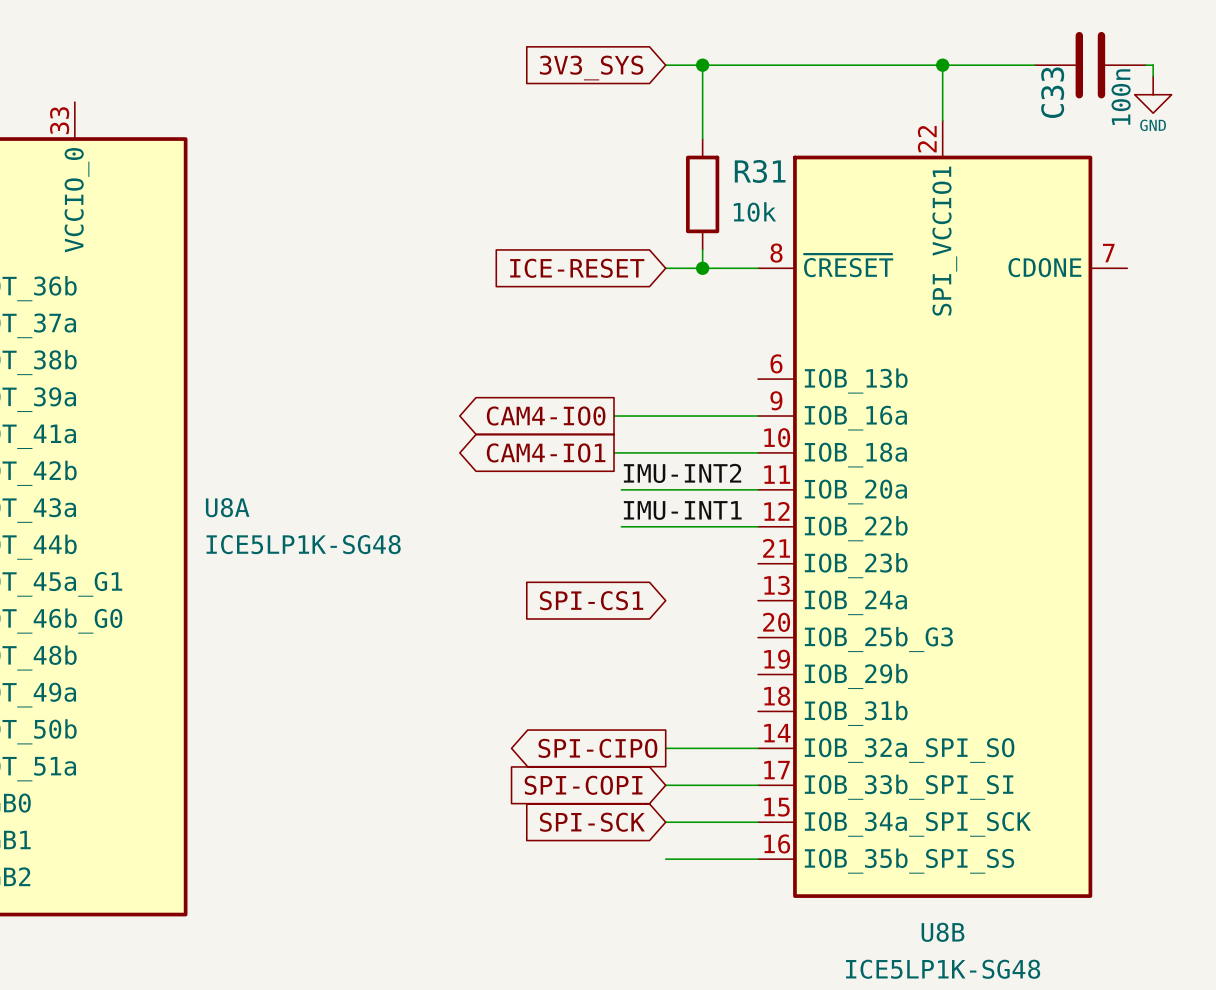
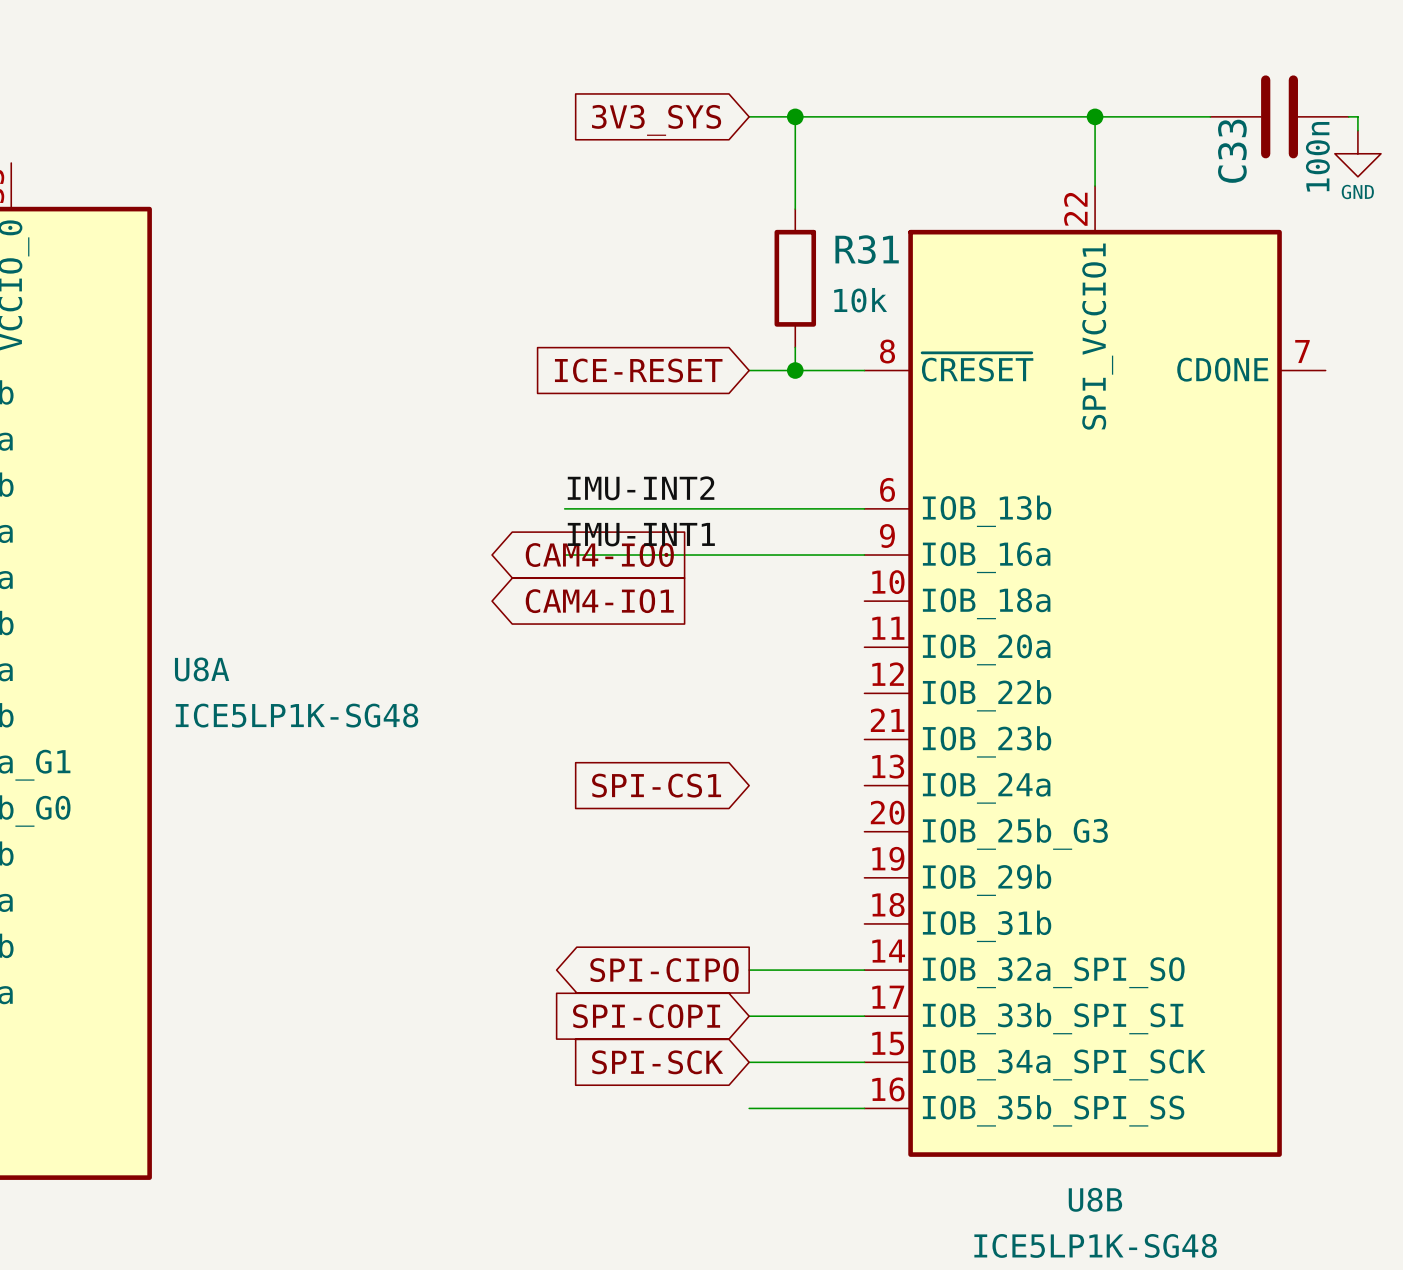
wire: none -> (564, 508) (864, 508)
wire: none -> (564, 555) (684, 555)
wire: (614, 452) (758, 452) -> none
label position: IMU-INT2 (682, 473) -> IMU-INT2 (641, 488)
wire: (621, 489) (758, 489) -> none
label position: IMU-INT1 (682, 510) -> IMU-INT1 (641, 534)
wire: (621, 526) (758, 526) -> none

